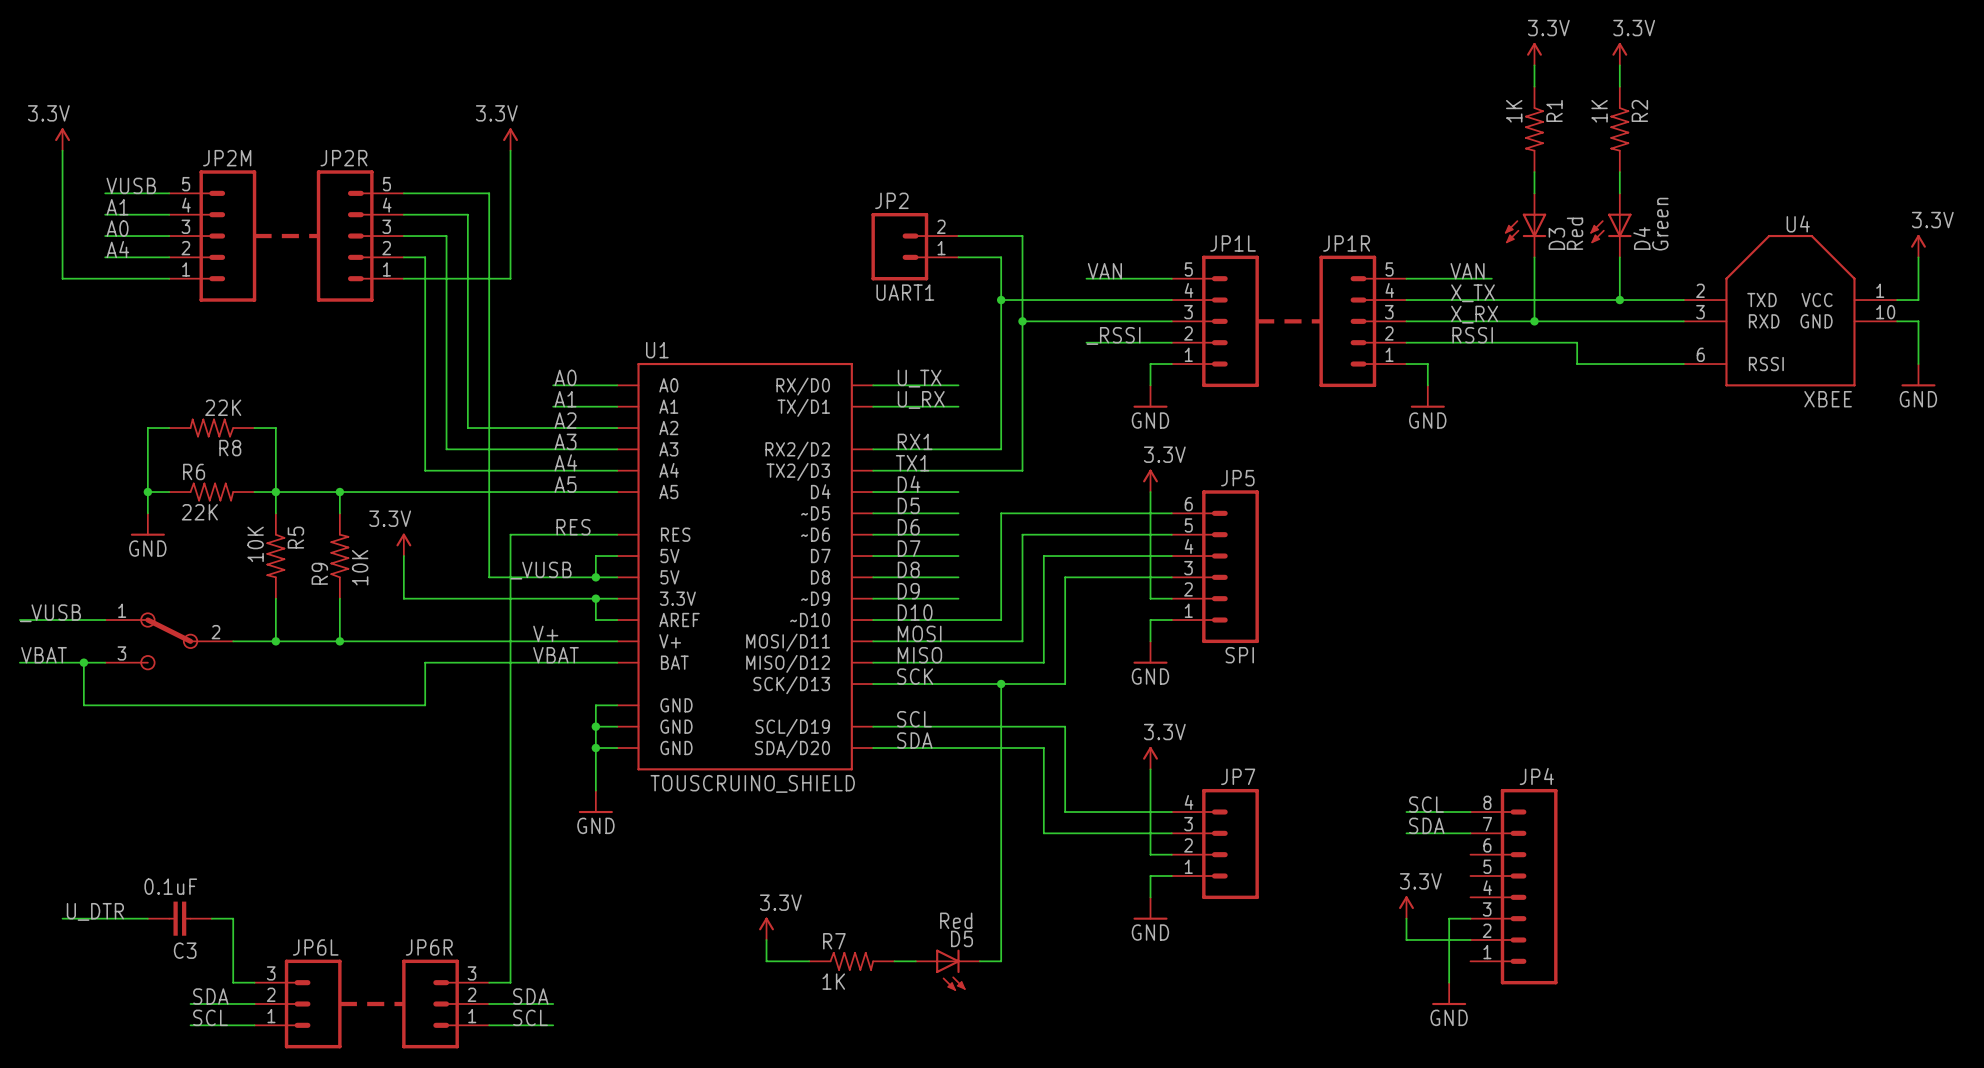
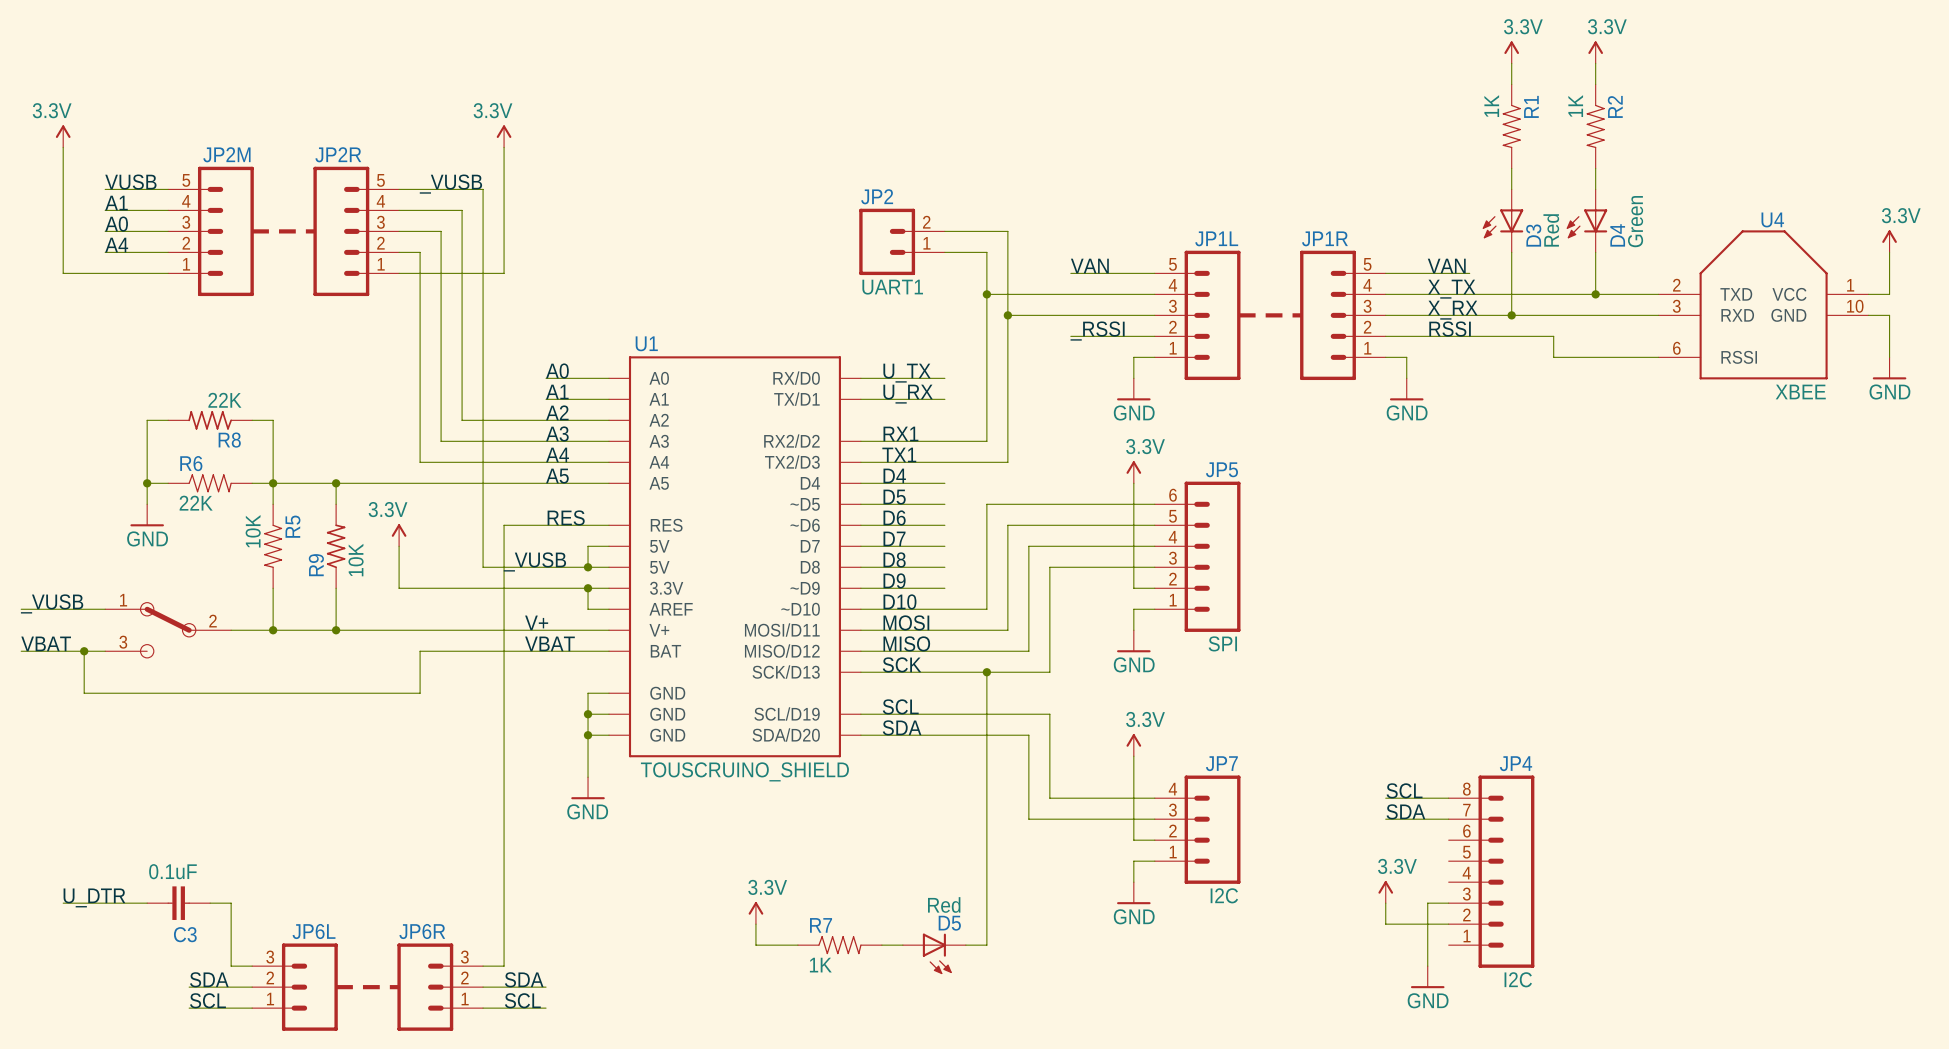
label: none -> _VUSB (450, 184)
JP7 value: none -> I2C (1224, 895)
JP4 value: none -> I2C (1518, 979)

